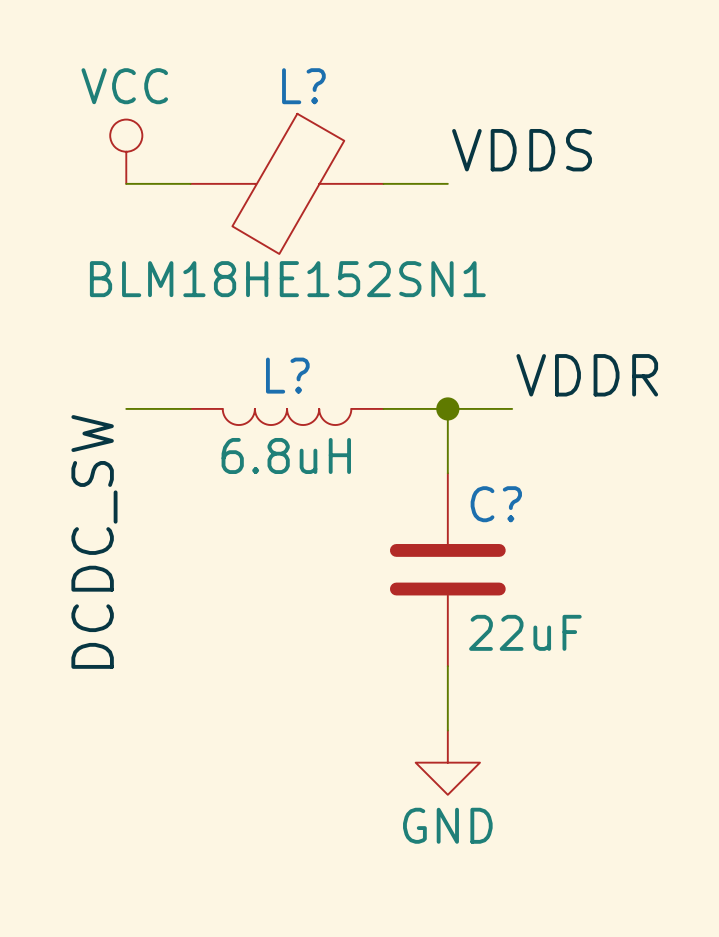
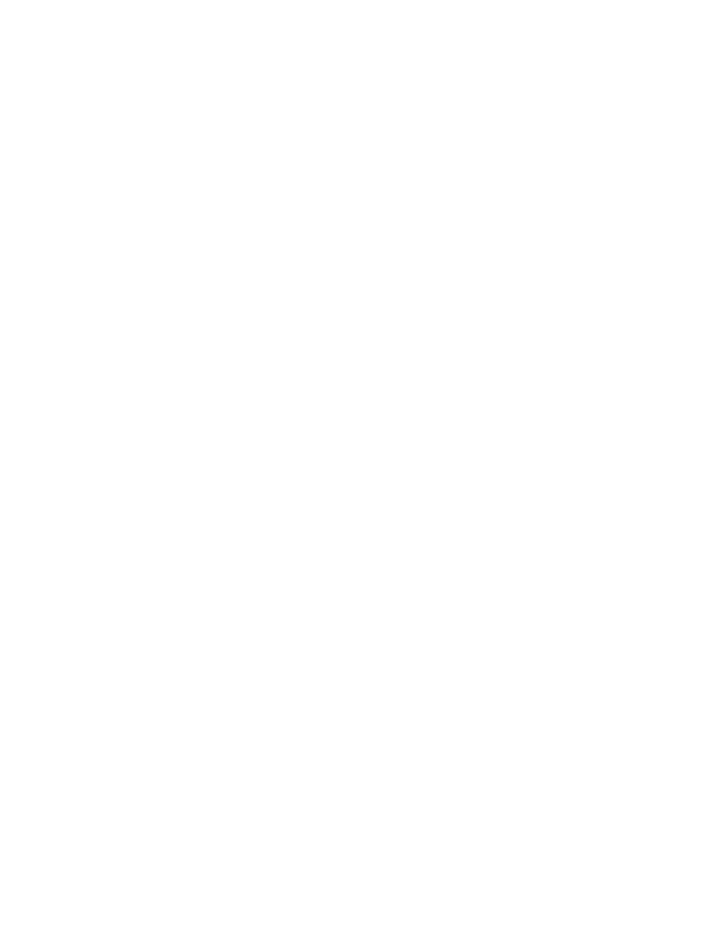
label: VDDS (522, 150) -> none
power symbol: VCC (126, 151) -> none
wire: (126, 183) (190, 183) -> none
L?: BLM18HE152SN1 (287, 183) -> none
wire: (383, 183) (447, 183) -> none
label: VDDR (587, 375) -> none
wire: (126, 408) (190, 408) -> none
wire: (383, 408) (512, 408) -> none
wire: (447, 408) (447, 473) -> none
junction: (447, 408) -> none
L?: 6.8uH (287, 416) -> none
label: DCDC_SW (94, 541) -> none
C?: 22uF (447, 569) -> none
wire: (447, 666) (447, 730) -> none
power symbol: GND (447, 762) -> none

